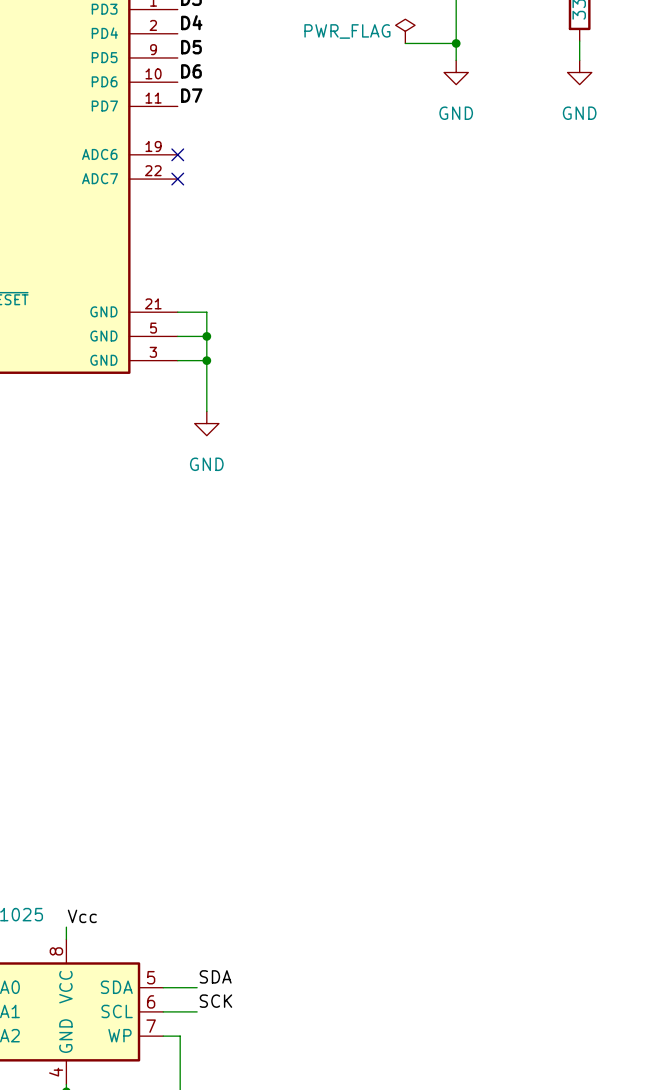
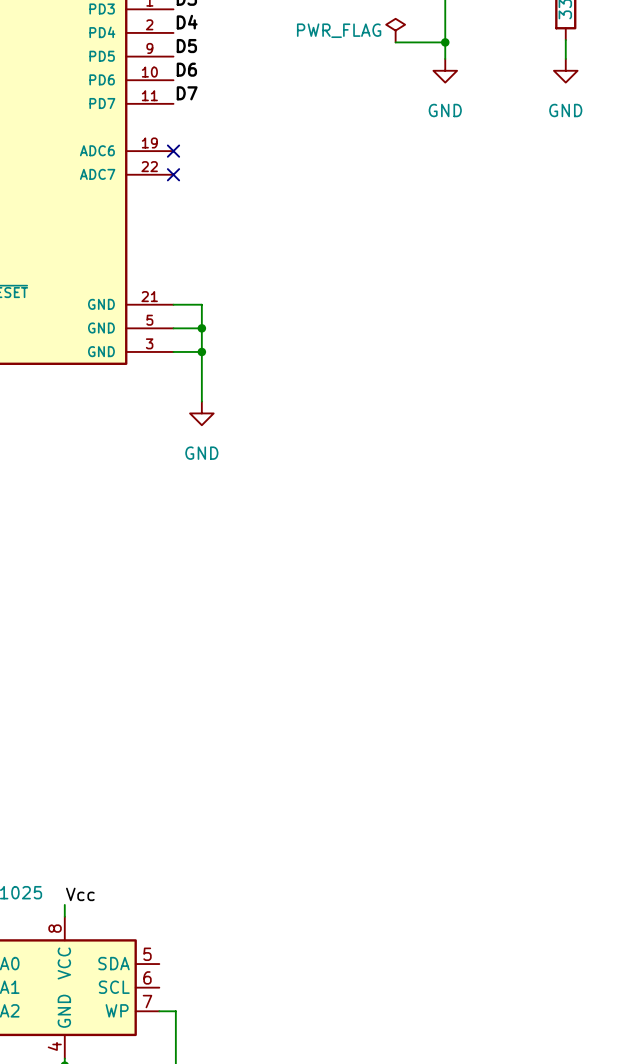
label: SDA (215, 976) -> none
wire: (163, 987) (197, 987) -> none
label: SCK (215, 1001) -> none
wire: (163, 1011) (197, 1011) -> none

